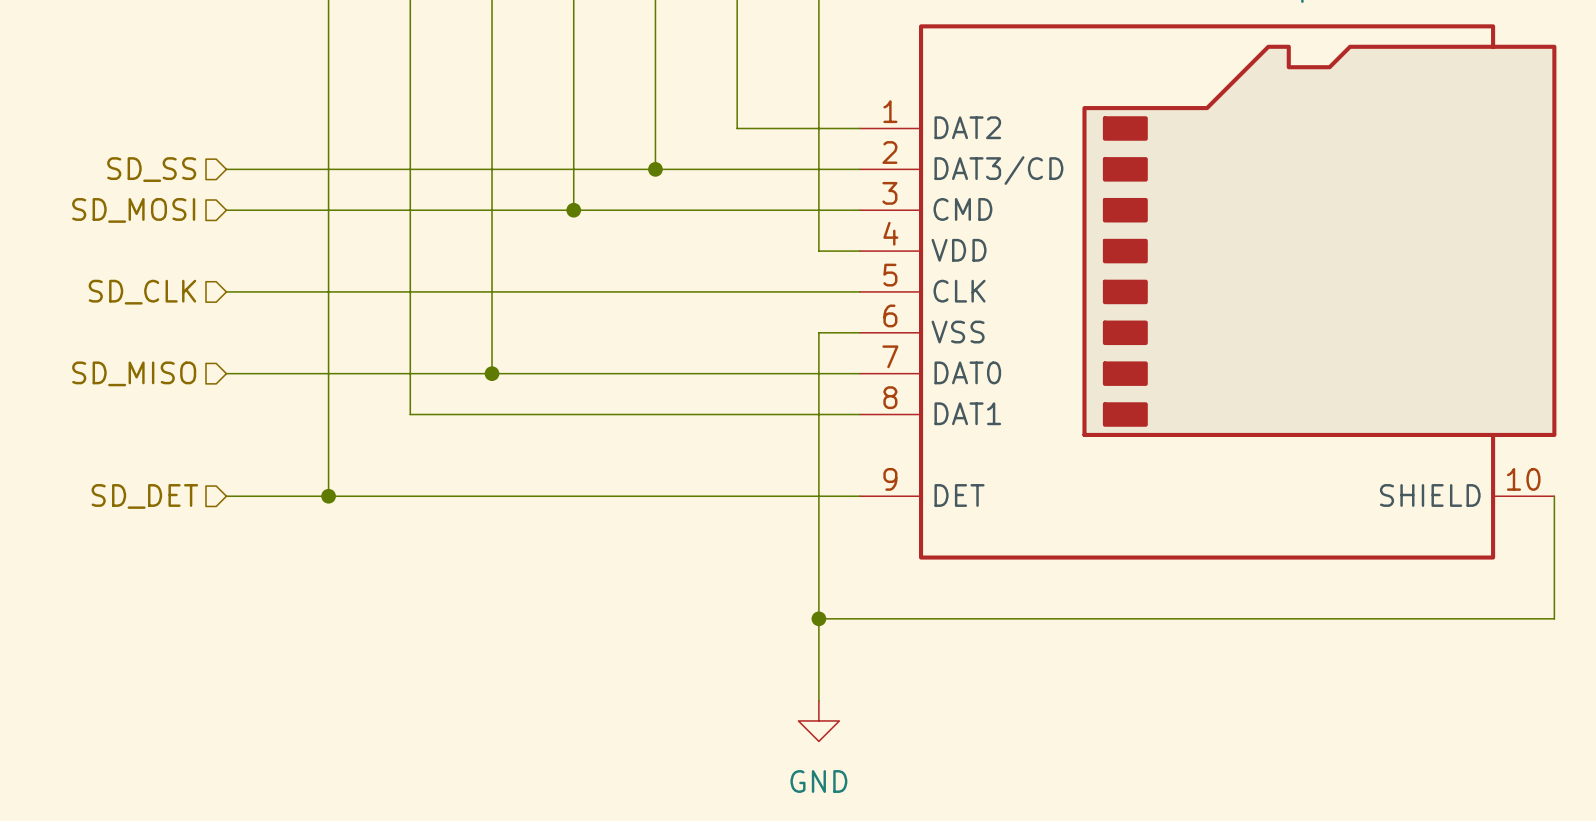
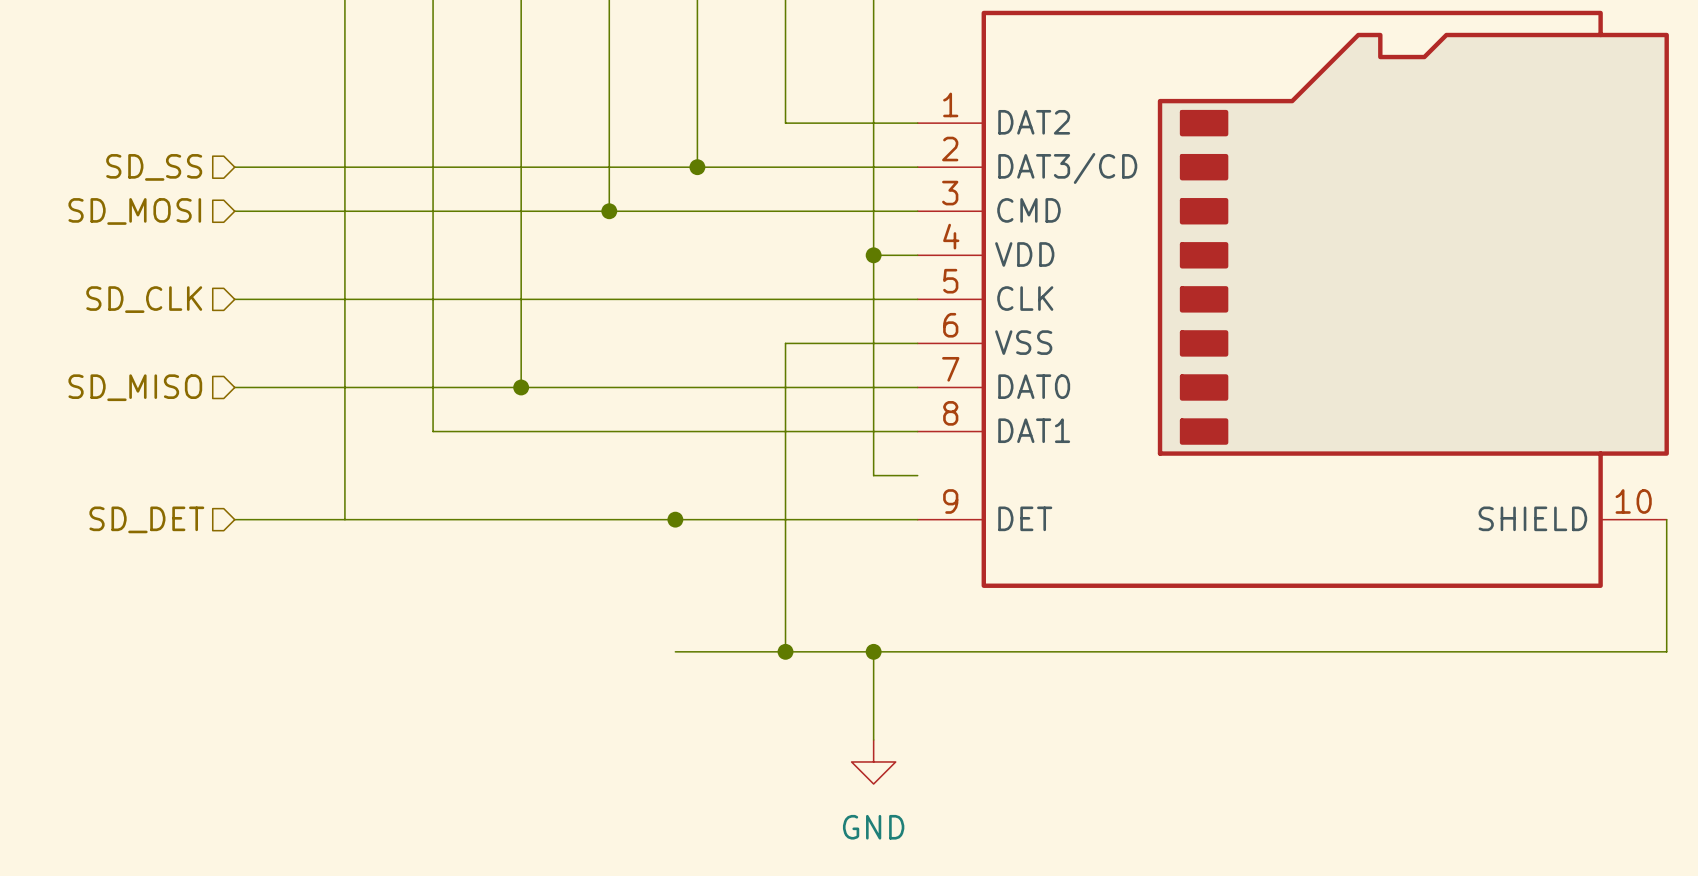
wire: none -> (873, 255) (873, 343) (785, 343) (785, 651)
junction: none -> (873, 255)
wire: (818, 455) (818, 618) -> (873, 475) (917, 475)
junction: (328, 496) -> none
junction: none -> (675, 519)
wire: none -> (675, 651) (873, 651)
junction: none -> (785, 651)

